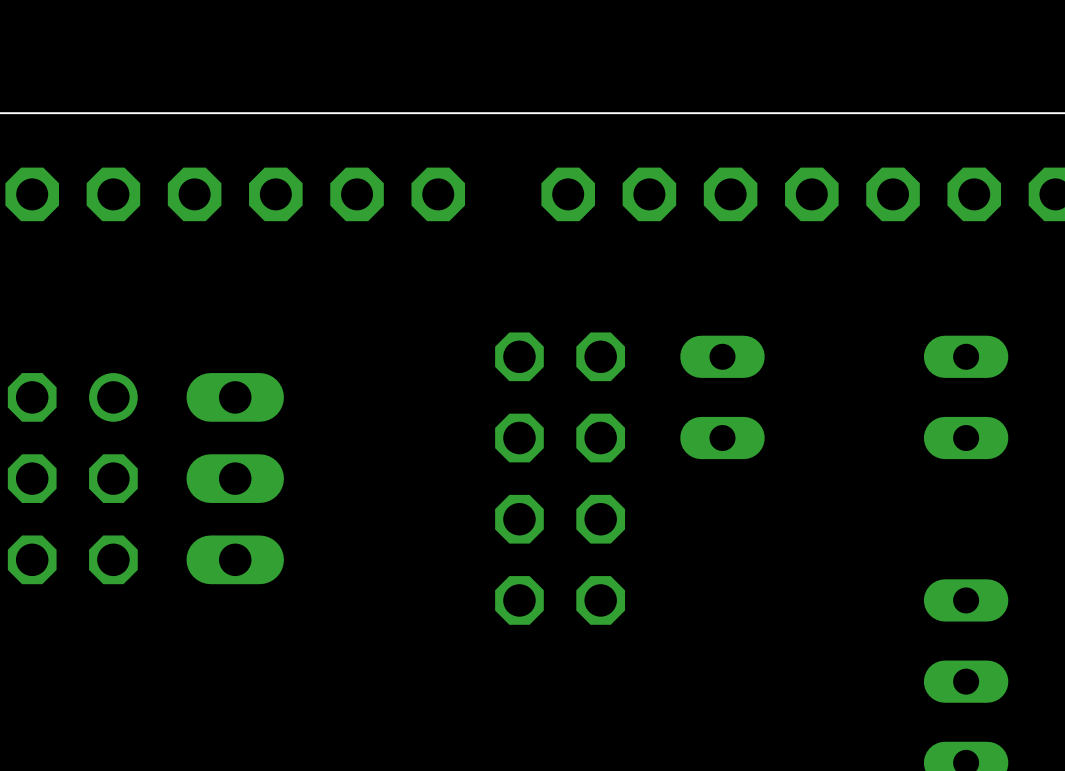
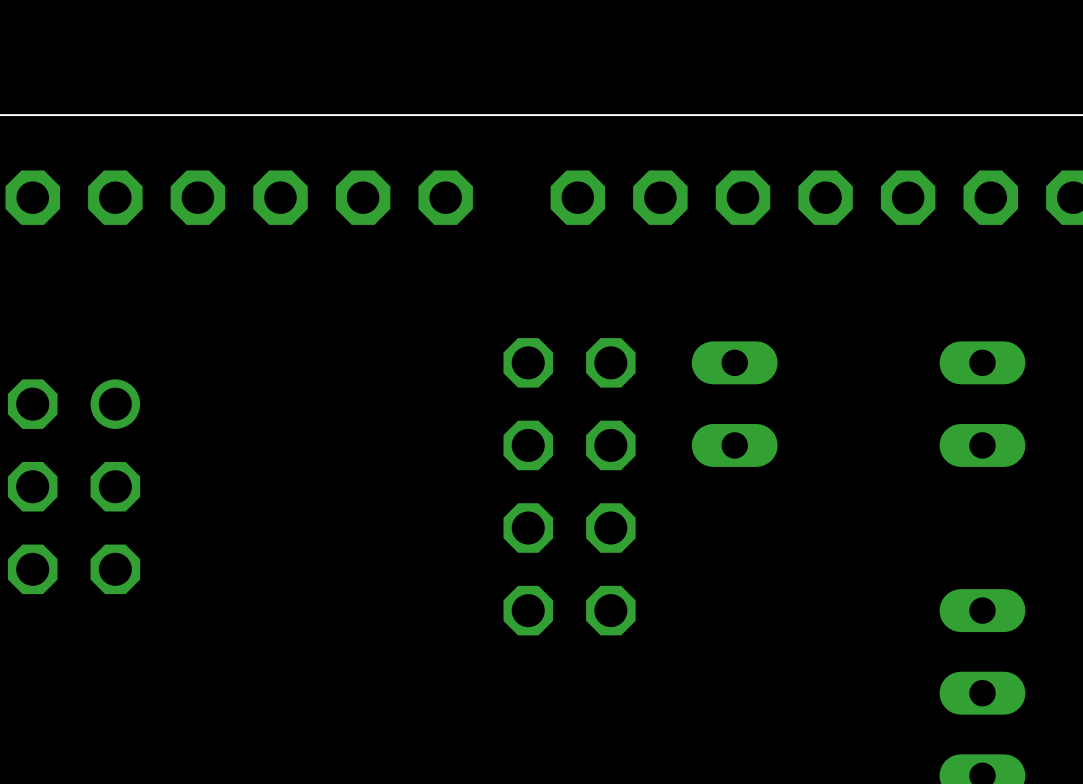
part: (235, 478) -> none

